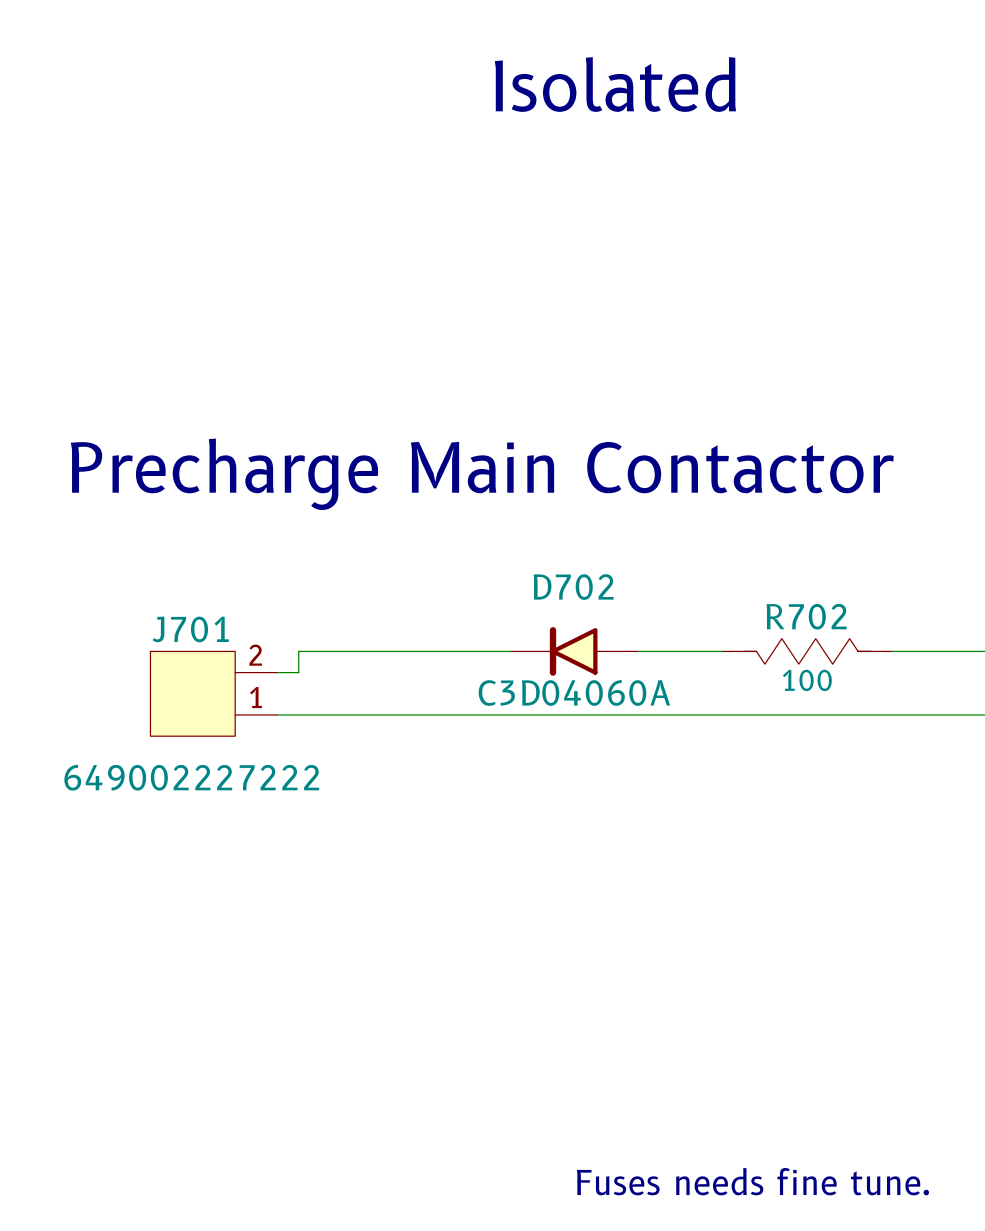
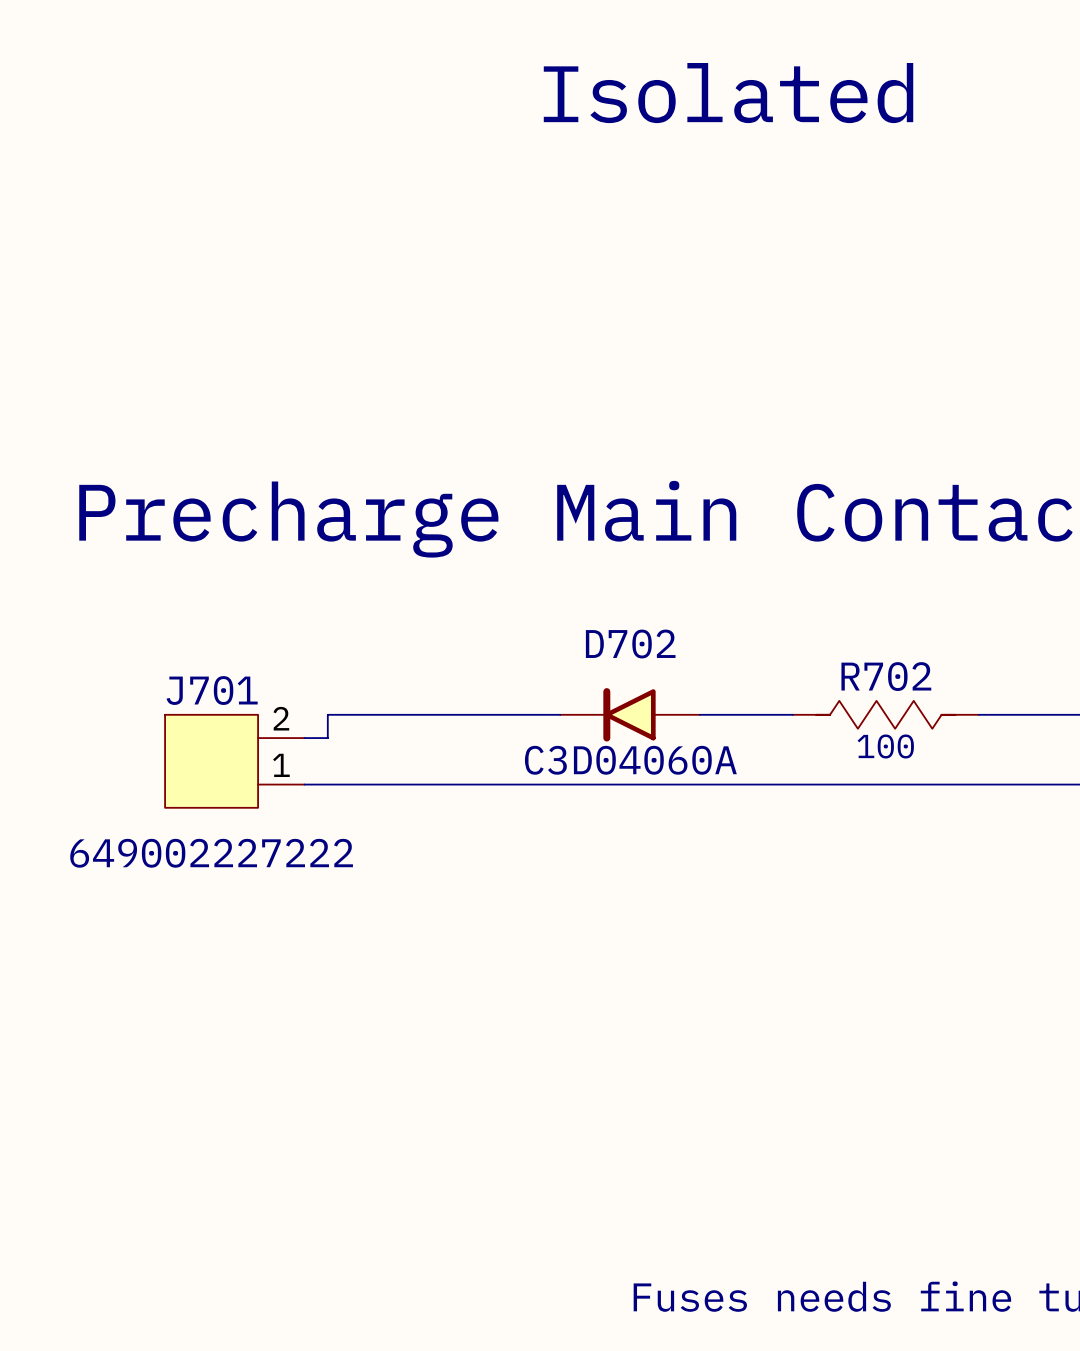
R702 flip: as is (807, 651) -> left-right (885, 714)

